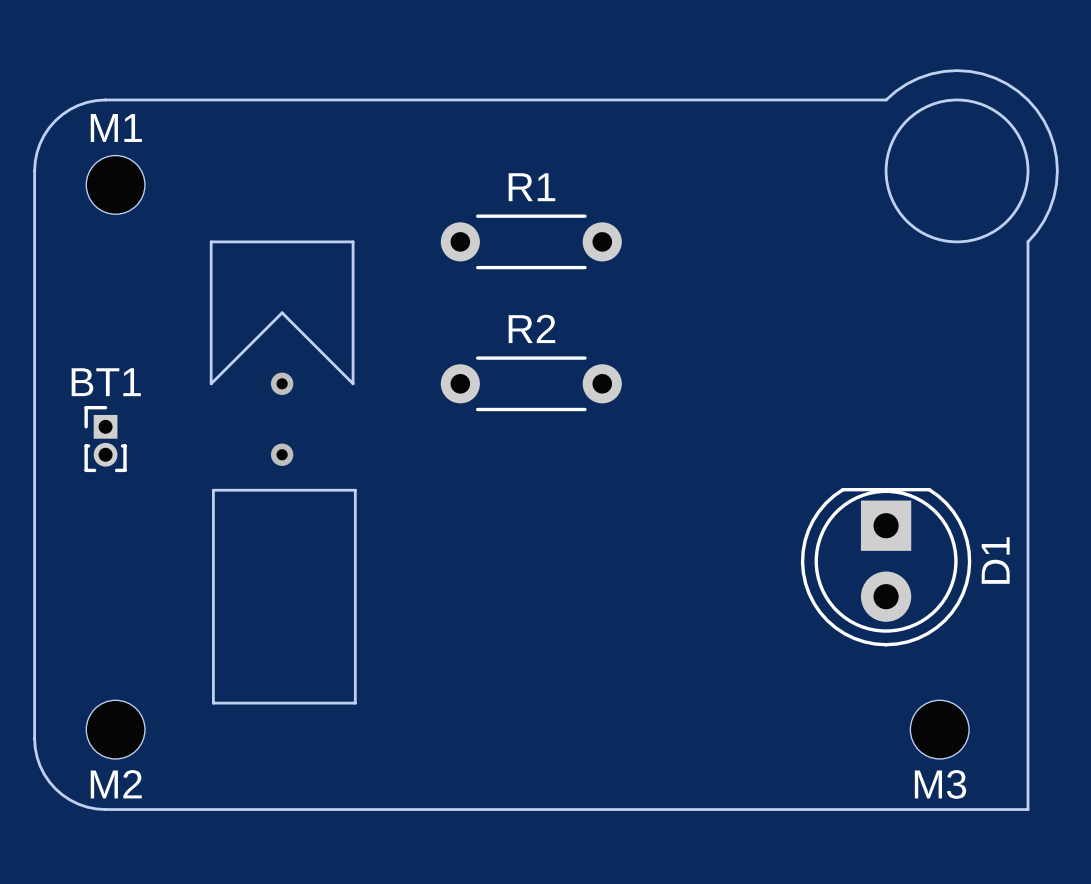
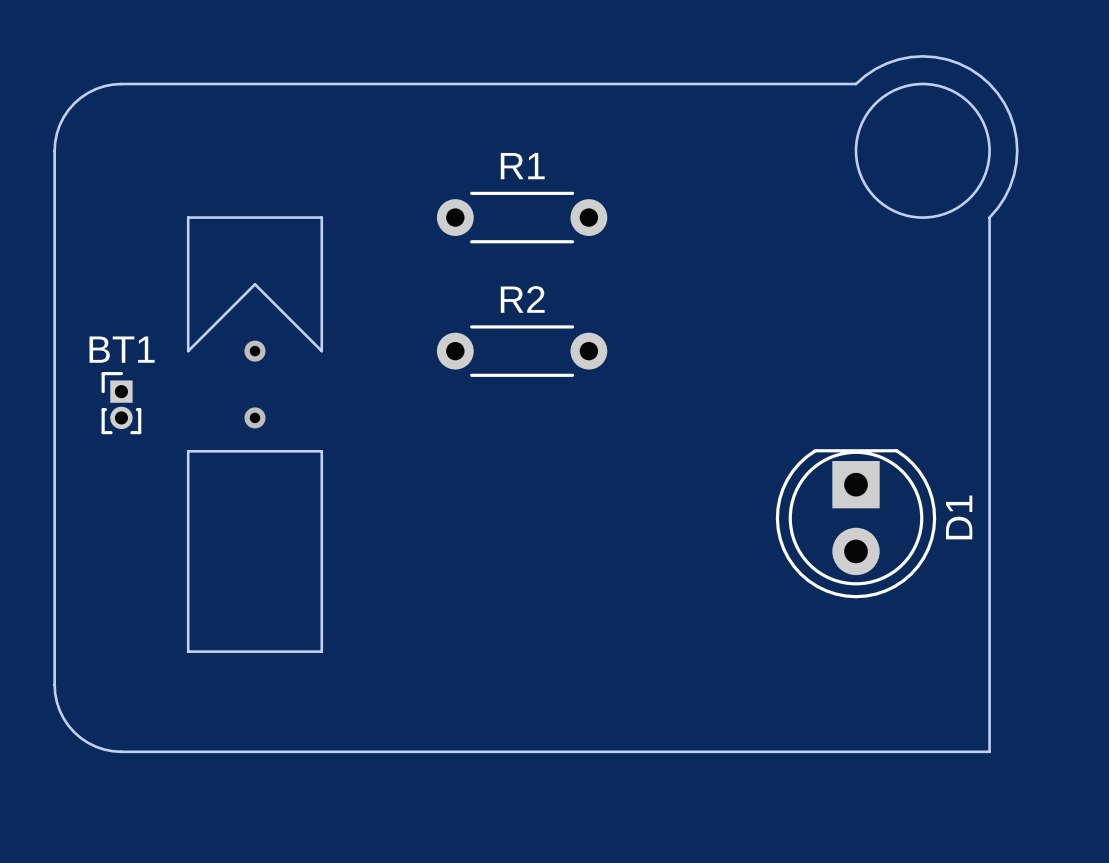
M1: (115, 184) -> none
board edge: (211, 241) (211, 383) (282, 312) (353, 383) (353, 241) (318, 241) -> (220, 217) (188, 217) (188, 351) (254, 284) (321, 351) (321, 217)
via position: (282, 383) -> (254, 351)
via position: (282, 454) -> (254, 417)
board edge: (213, 490) (213, 703) -> (222, 451) (188, 451) (188, 651) (222, 651)
board edge: (318, 490) (355, 490) (355, 703) (318, 703) -> (321, 451) (321, 651)
M2: (115, 729) -> none
M3: (939, 729) -> none

